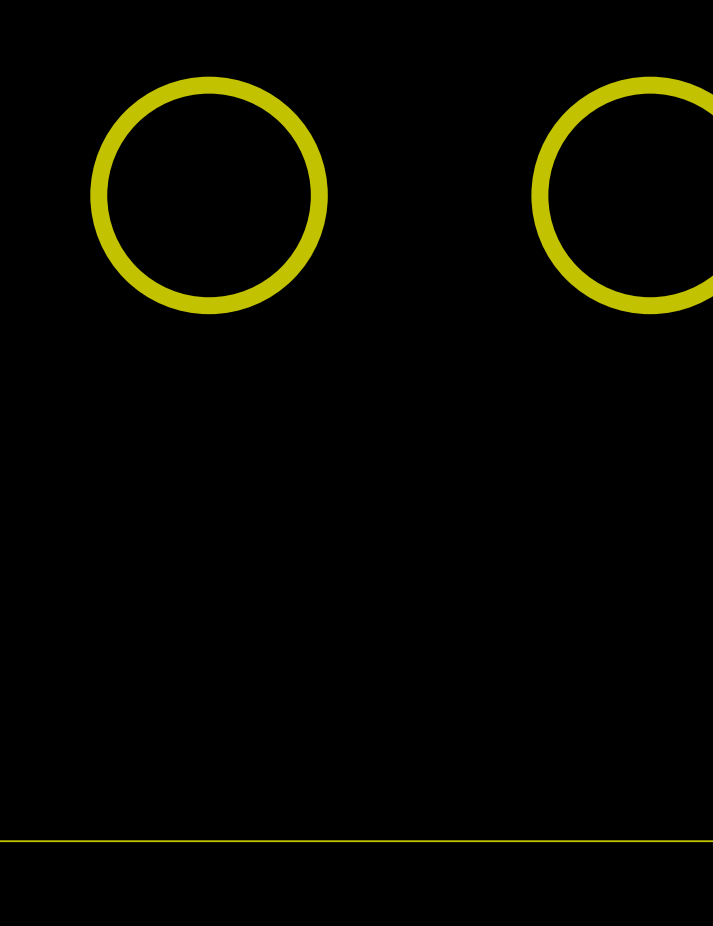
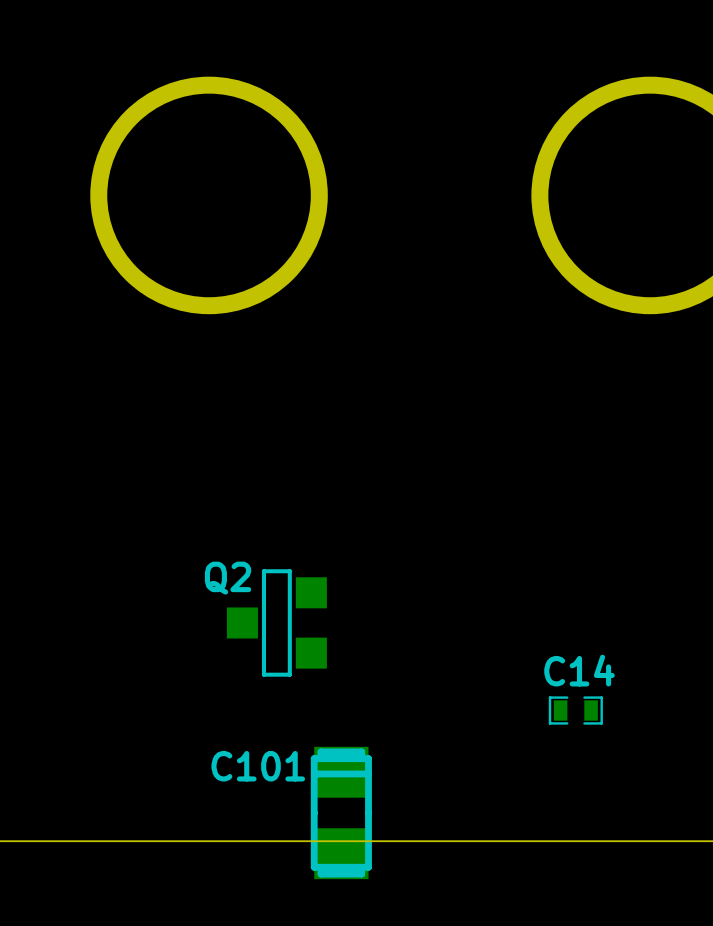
Q2: none -> (276, 622)
C14: none -> (575, 710)
C101: none -> (341, 812)

